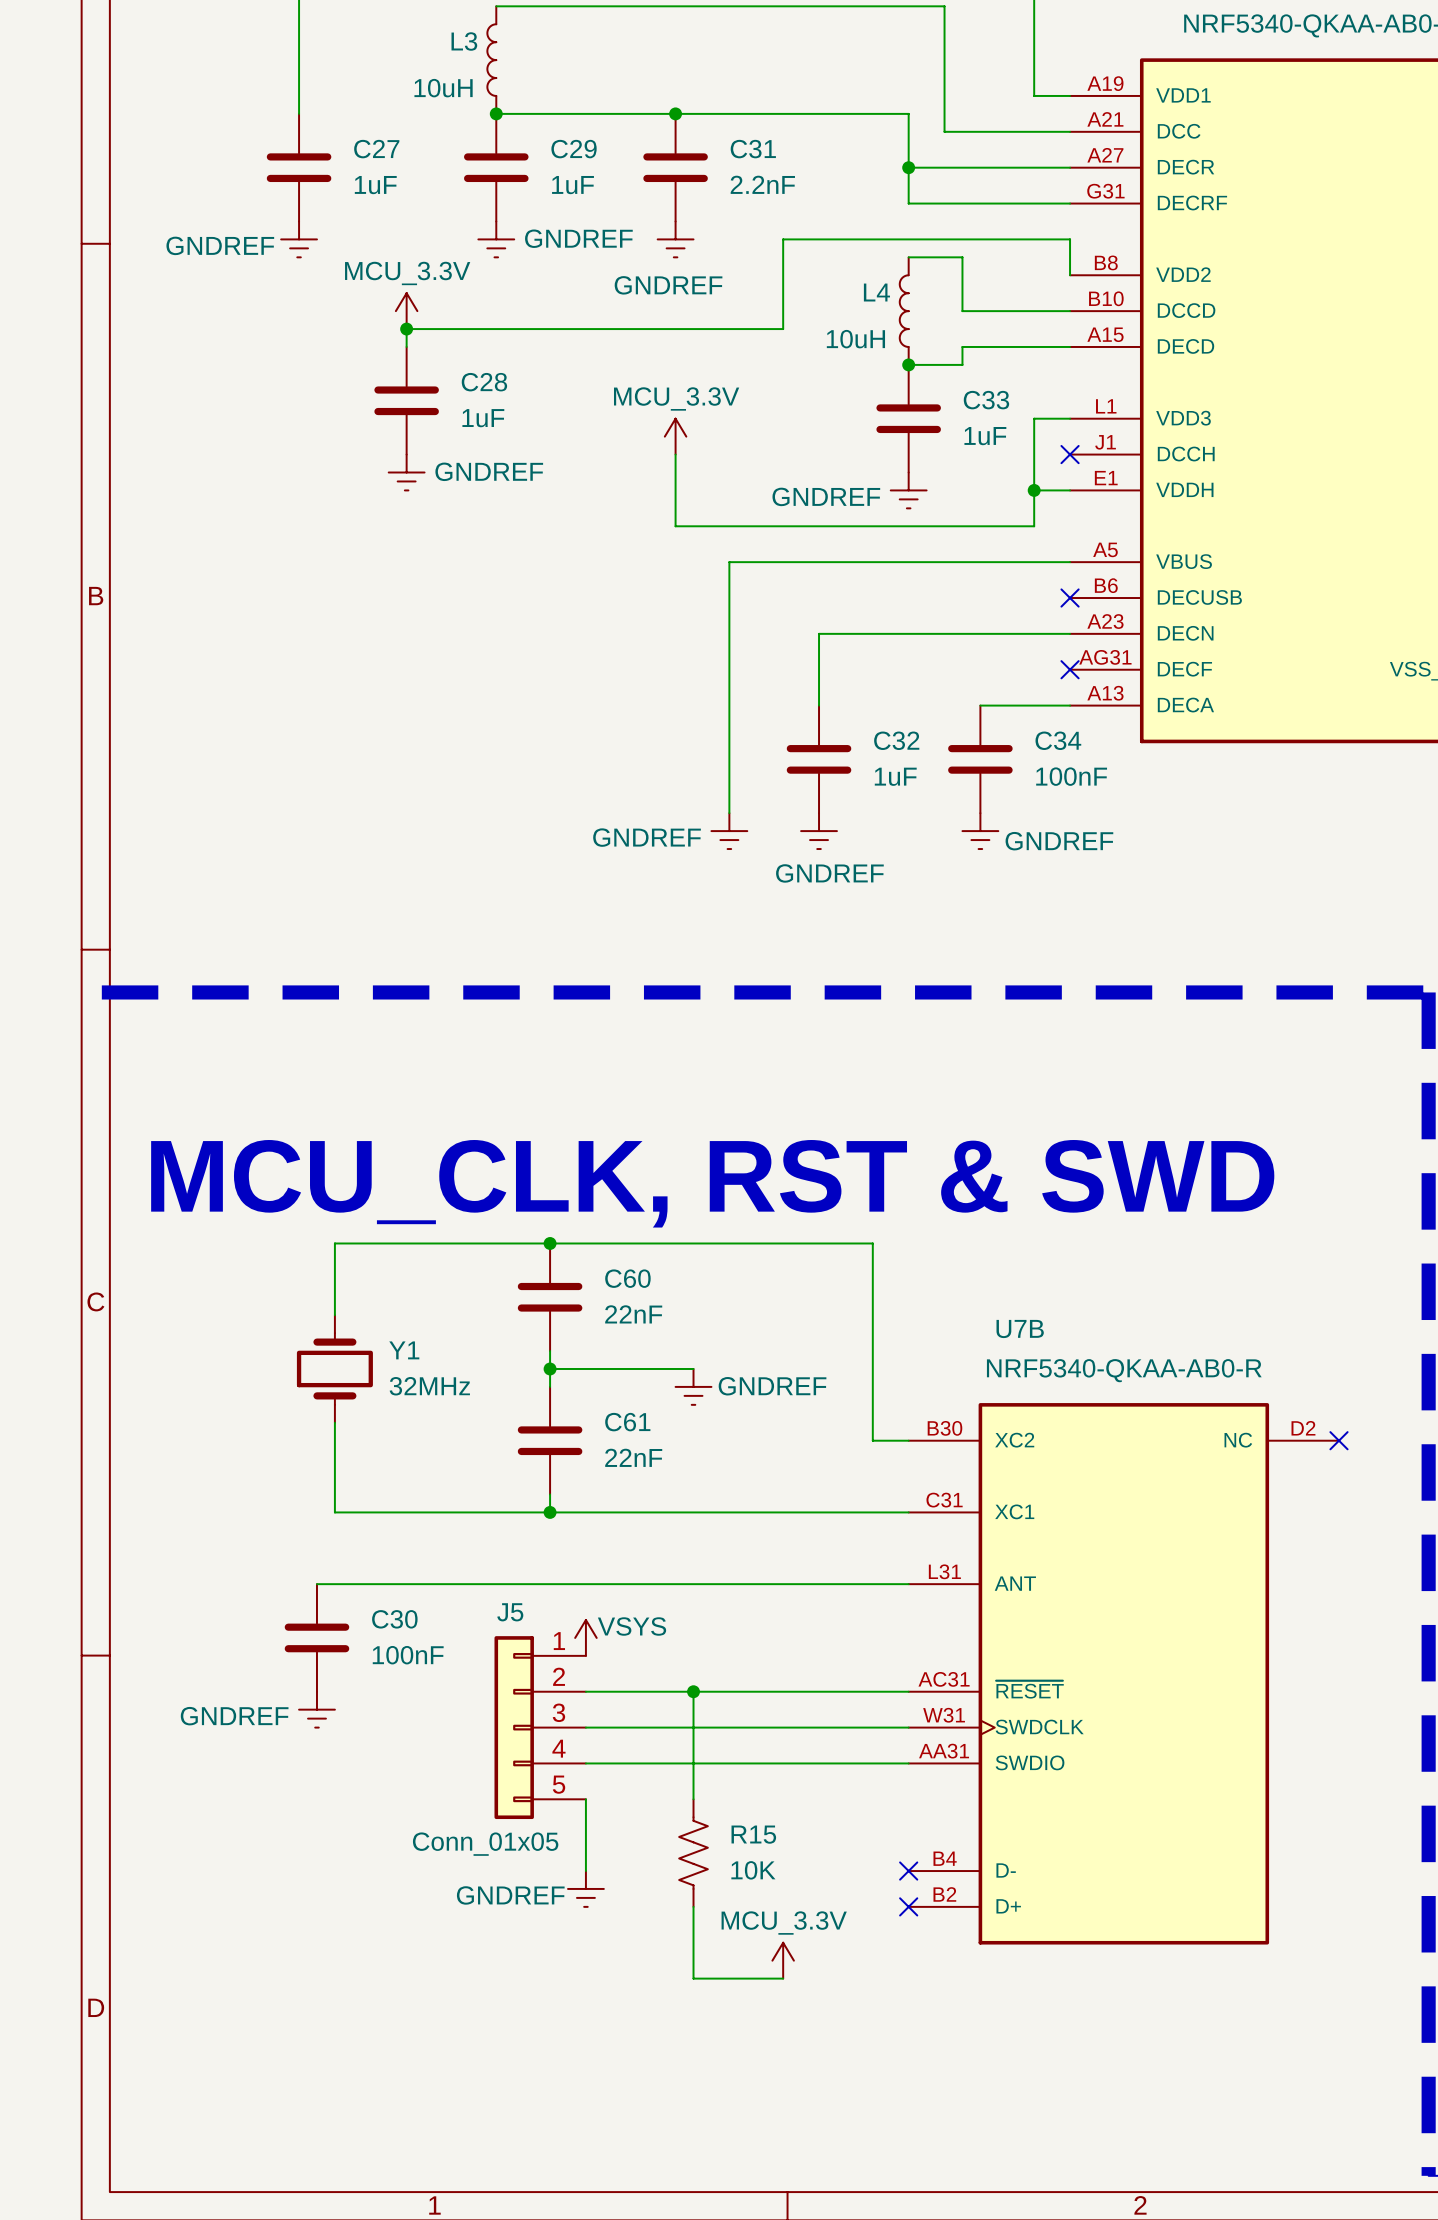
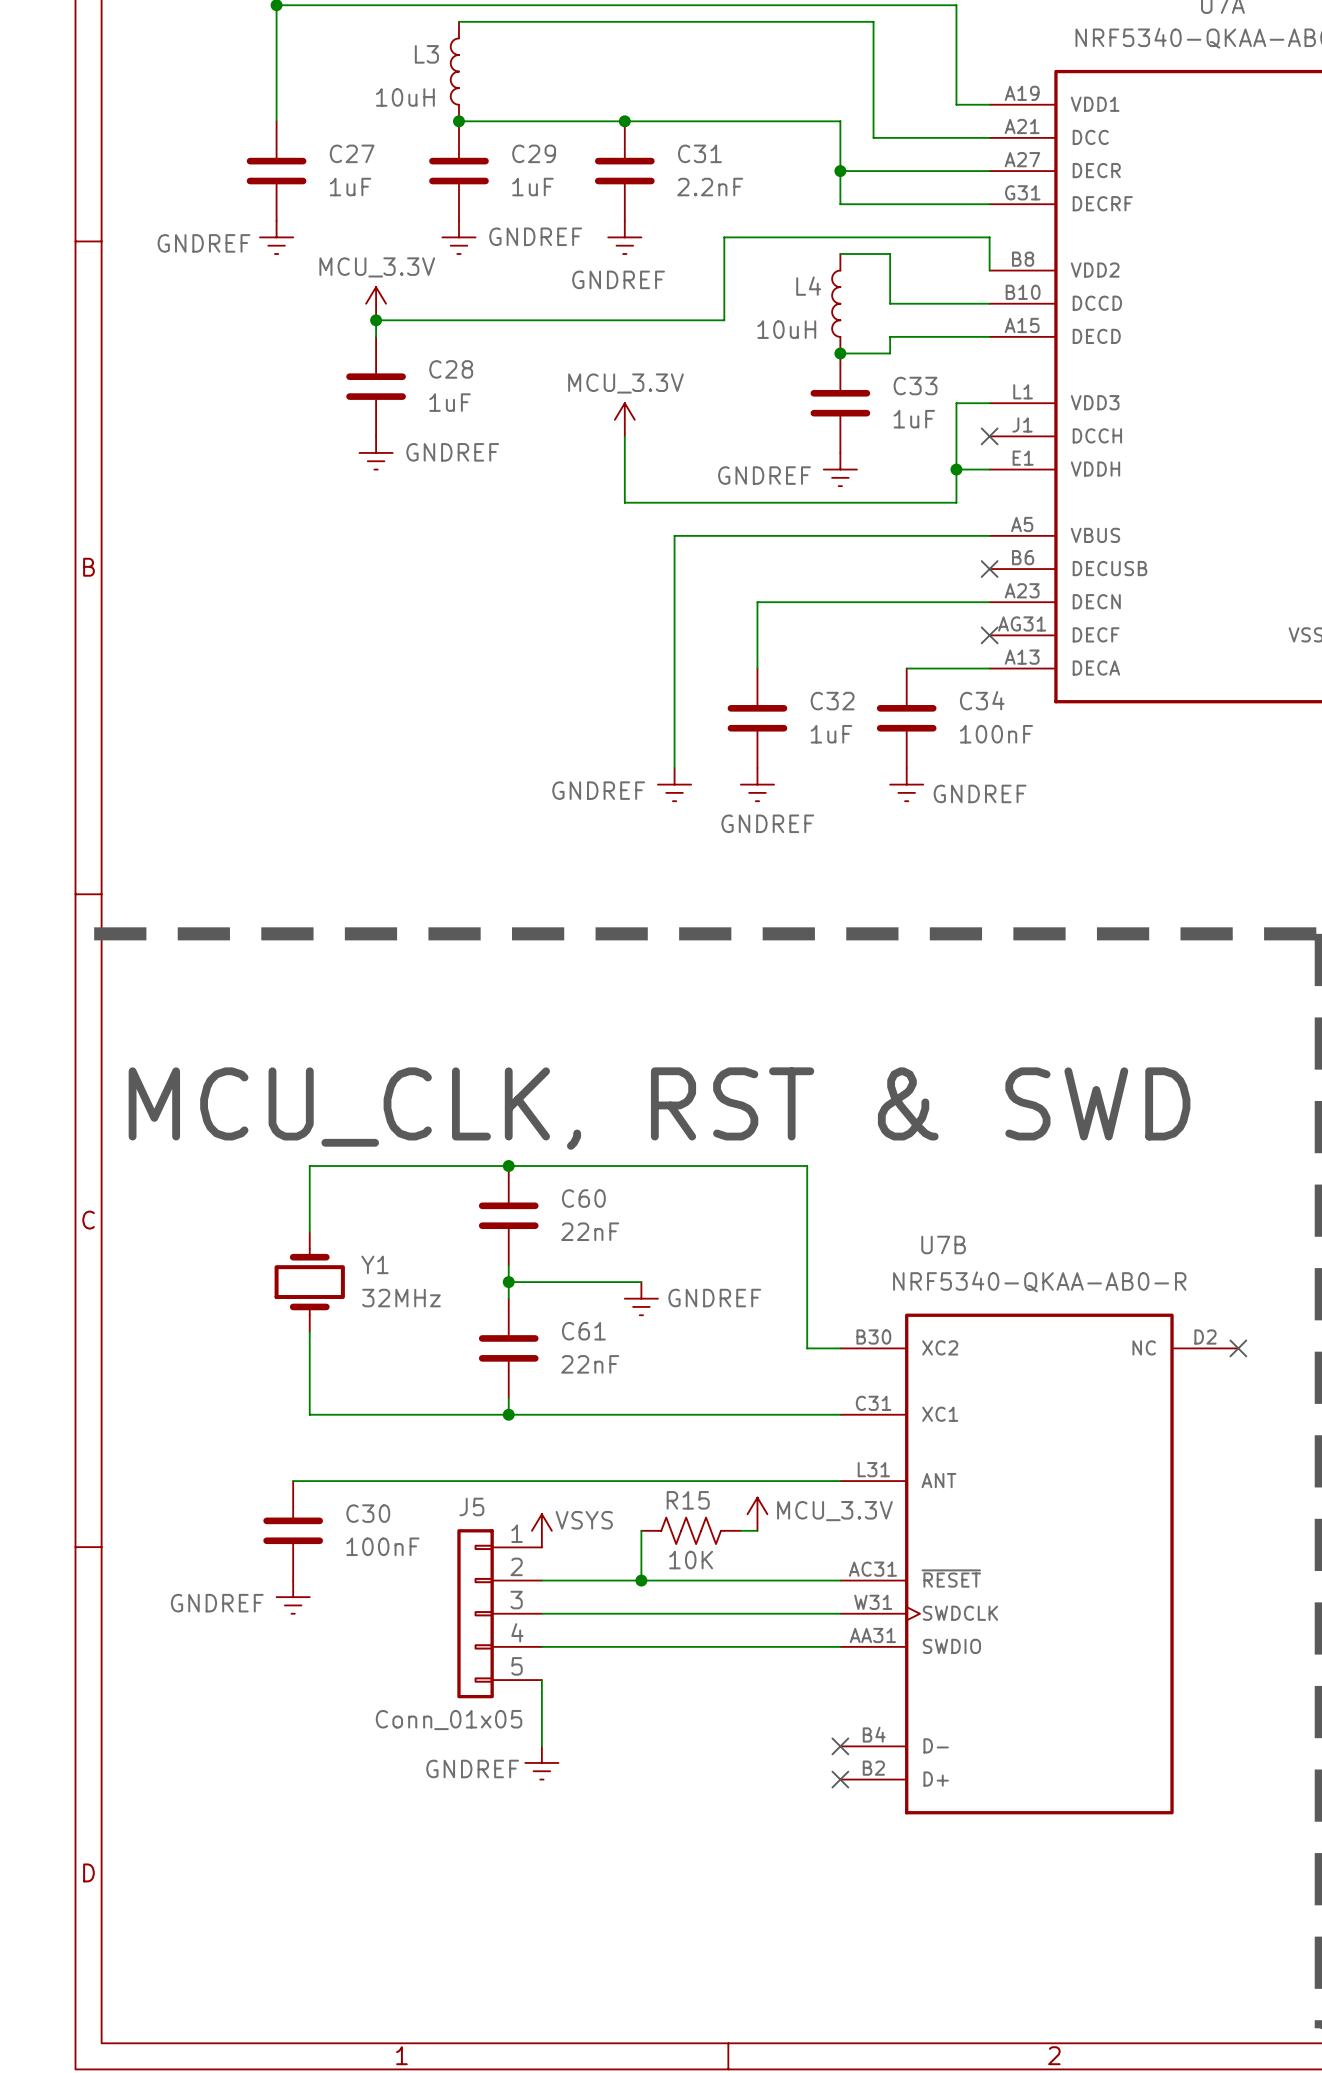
wire: none -> (740, 1530) (757, 1530)
wire: (693, 1691) (693, 1799) -> (641, 1580) (641, 1530)
R15 name position: R15 (753, 1834) -> R15 (688, 1500)
R15 rotation: 0° (693, 1853) -> 90° clockwise (691, 1530)
R15 position: (693, 1853) -> (691, 1530)
R15 value position: 10K (753, 1870) -> 10K (691, 1560)
wire: (693, 1906) (693, 1978) (783, 1978) -> none
power symbol text position: MCU_3.3V (784, 1923) -> MCU_3.3V (834, 1511)
power symbol position: MCU_3.3V (783, 1960) -> MCU_3.3V (757, 1514)

